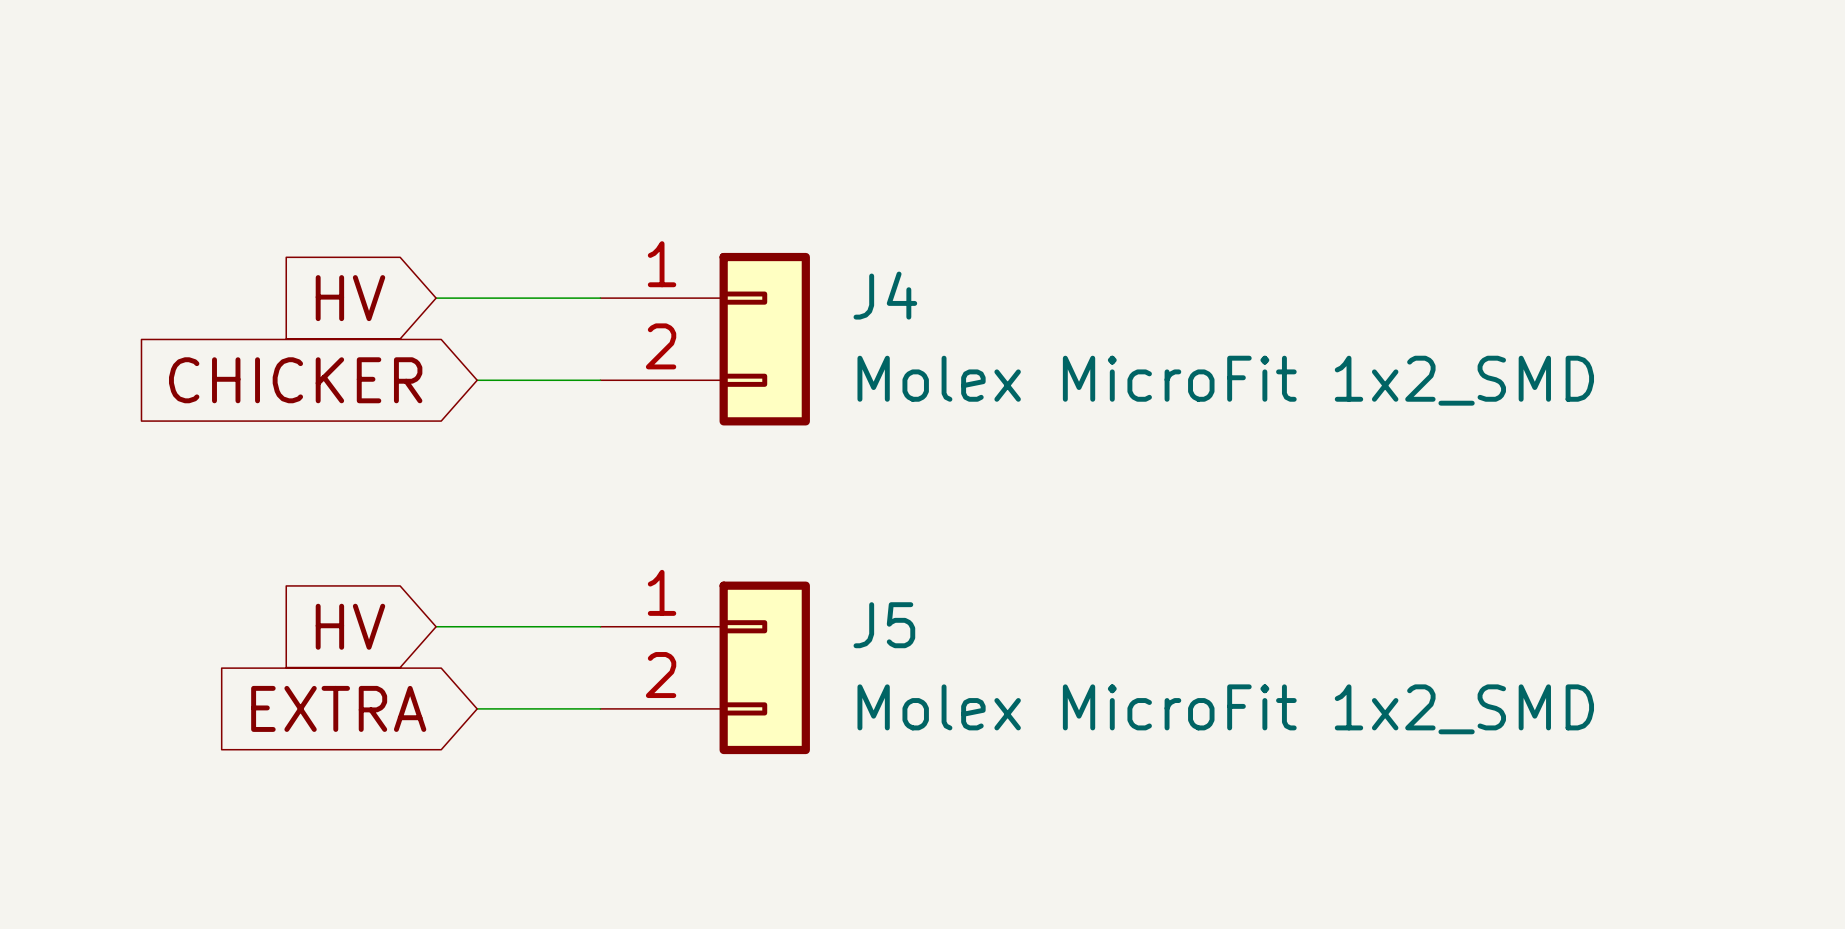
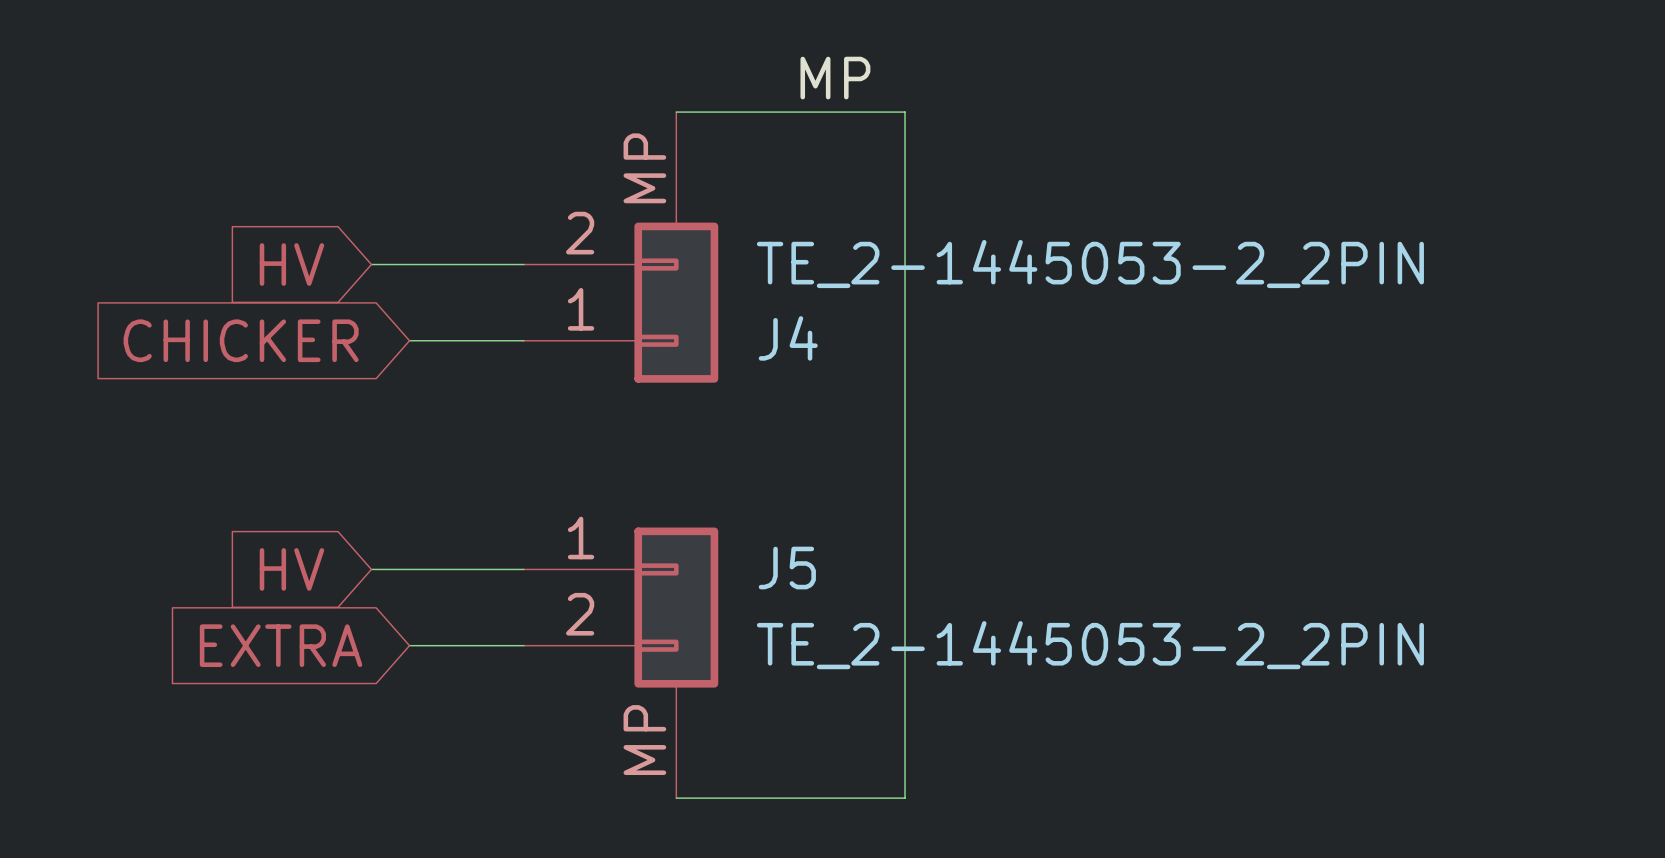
label: none -> MP (835, 78)
wire: none -> (676, 112) (905, 112) (905, 798) (676, 798)
J4 symbol: [600, 252, 810, 426] -> [523, 112, 719, 383]
J4 name position: J4 (885, 295) -> J4 (788, 338)
J4 value: Molex MicroFit 1x2_SMD (1225, 380) -> TE_2-1445053-2_2PIN (1090, 264)
J5 symbol: [600, 581, 810, 755] -> [523, 527, 719, 799]
J5 value: Molex MicroFit 1x2_SMD (1225, 709) -> TE_2-1445053-2_2PIN (1090, 645)

